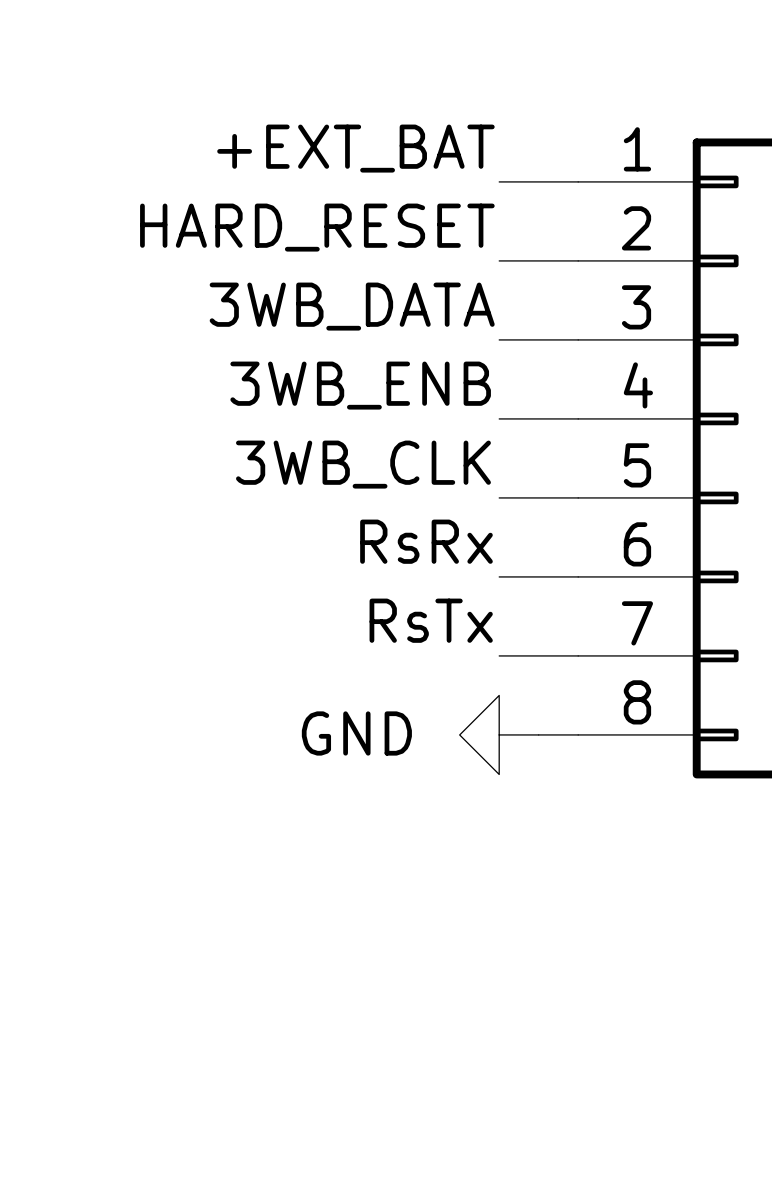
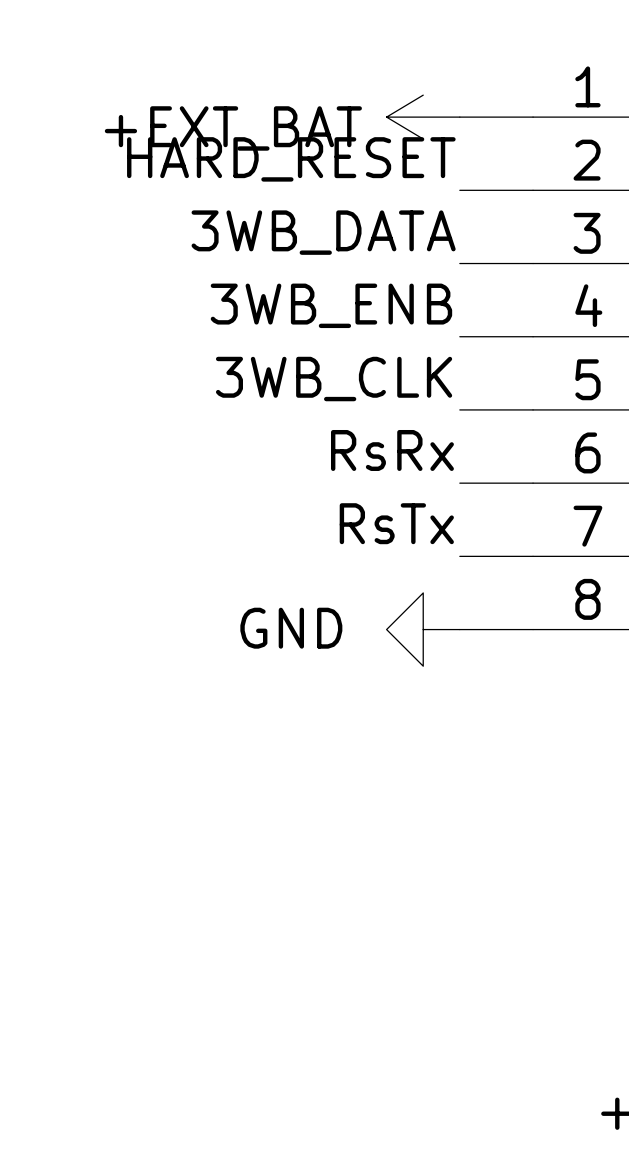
label: +EXT_BAT (355, 148) -> none
power symbol: none -> +EXT_BAT (423, 117)
power symbol position: GND (499, 734) -> GND (423, 629)

